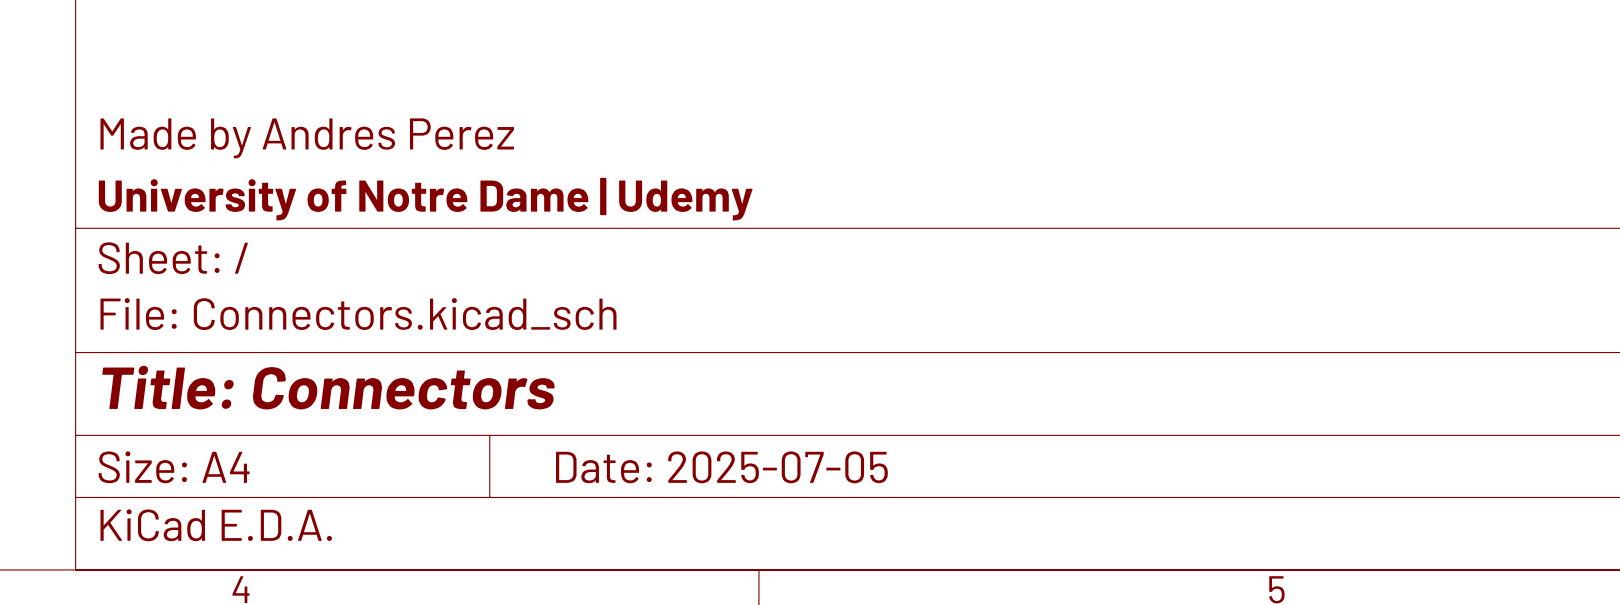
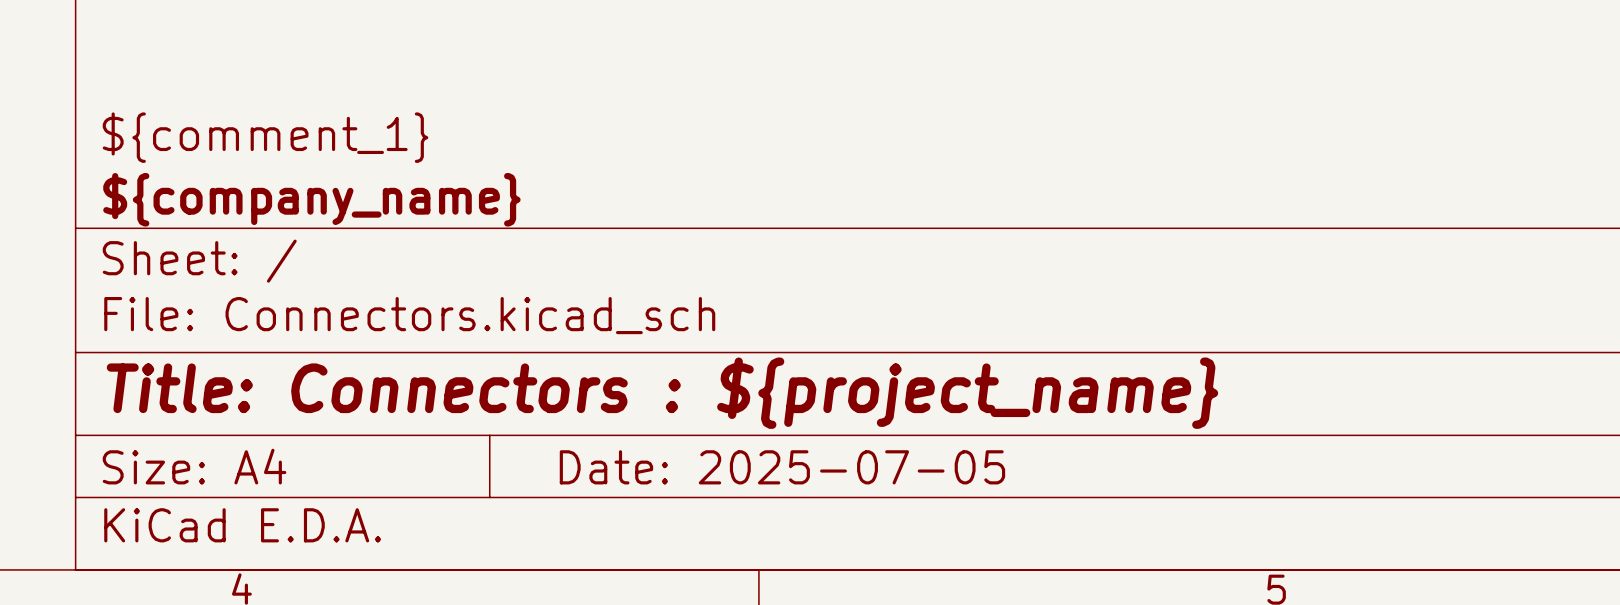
title block: Made by Andres Perez (307, 138) -> ${comment_1} (265, 137)
title block: University of Notre Dame | Udemy (425, 199) -> ${company_name} (311, 199)
title block: Title: Connectors (328, 387) -> Title: Connectors : ${project_name} (662, 393)

